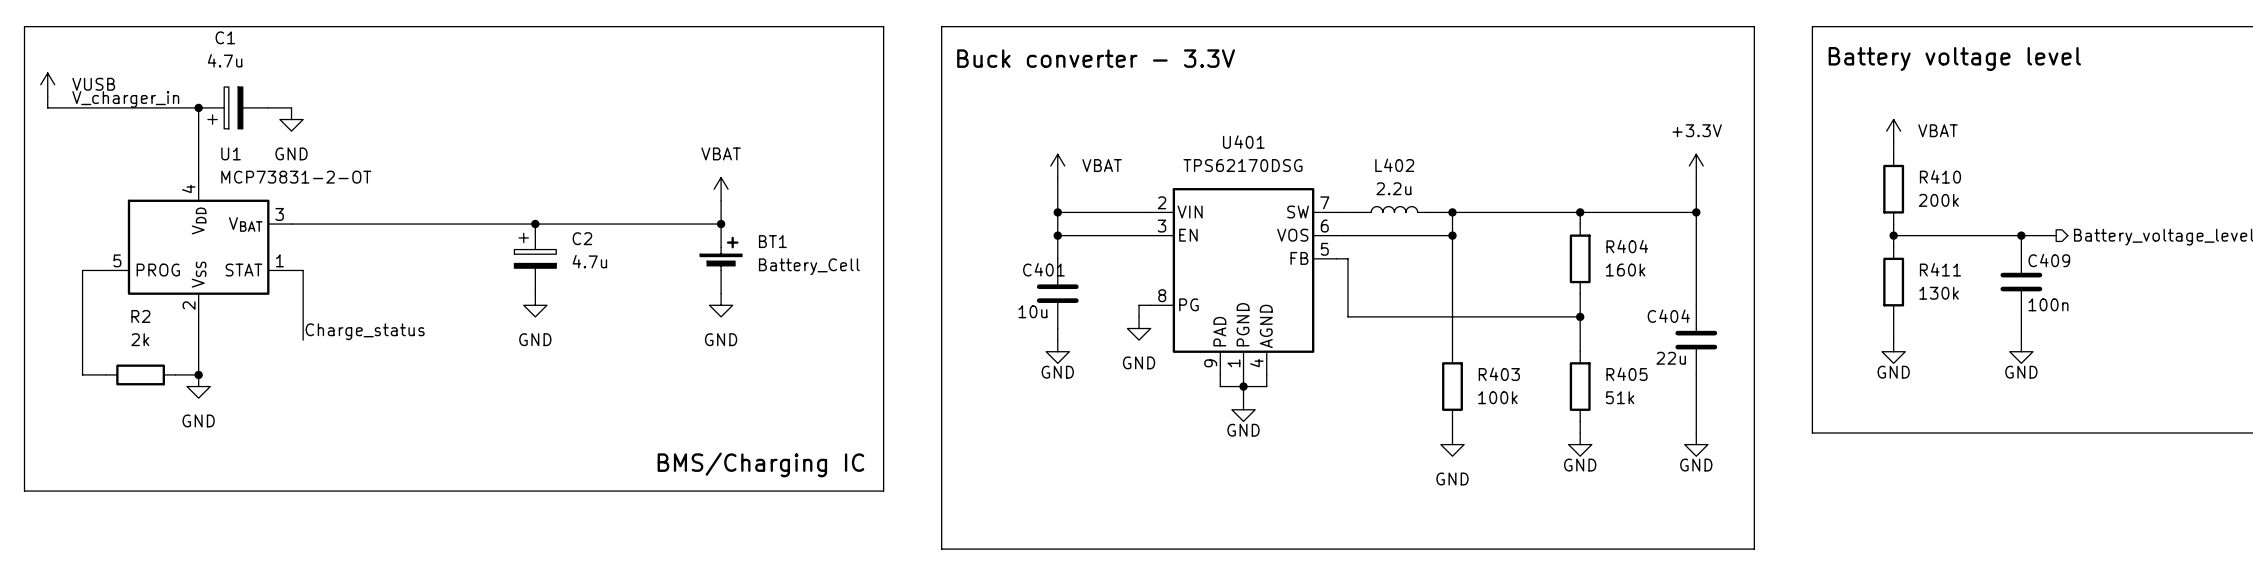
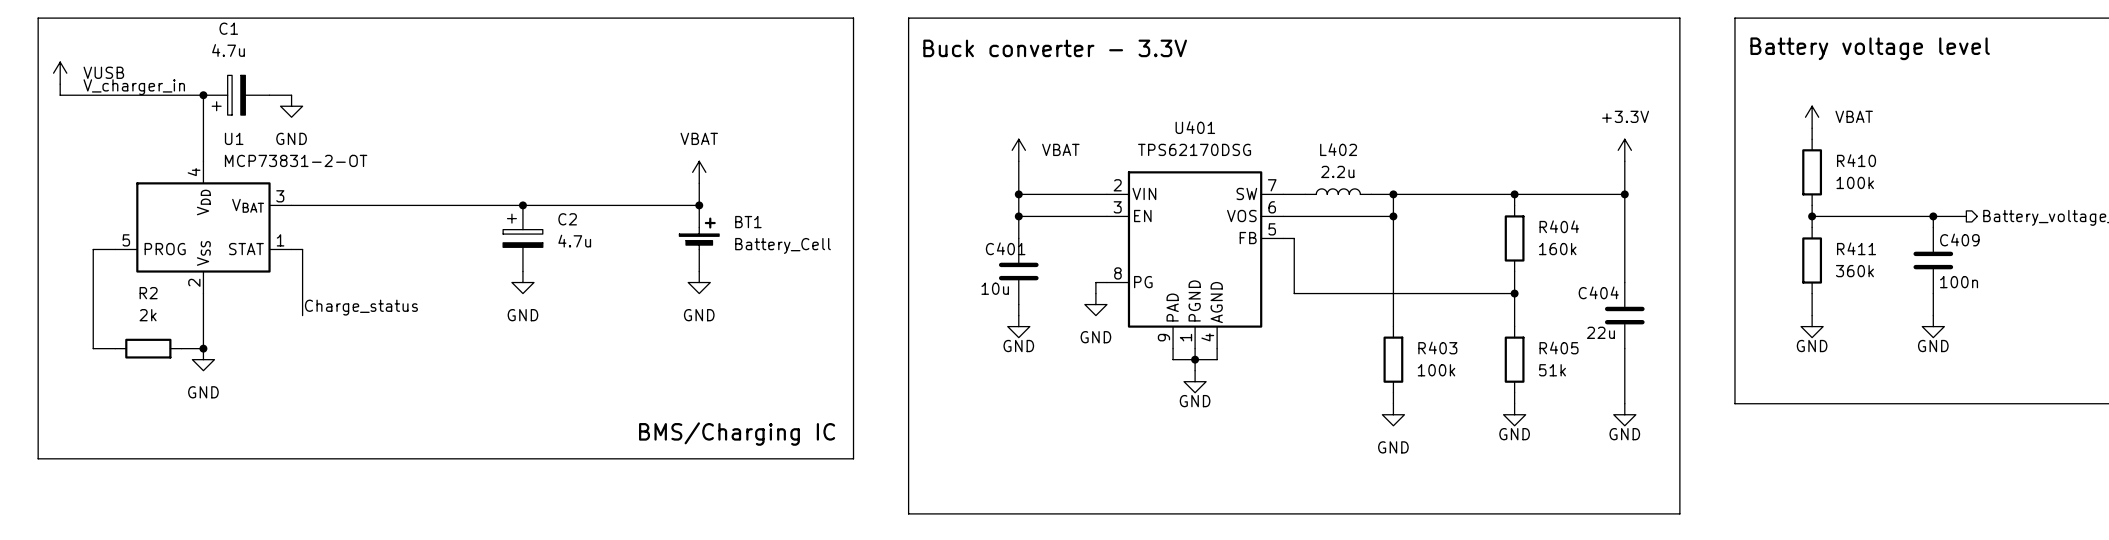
R410 value: 200k (1938, 200) -> 100k (1855, 182)
R411 value: 130k (1939, 293) -> 360k (1854, 271)

